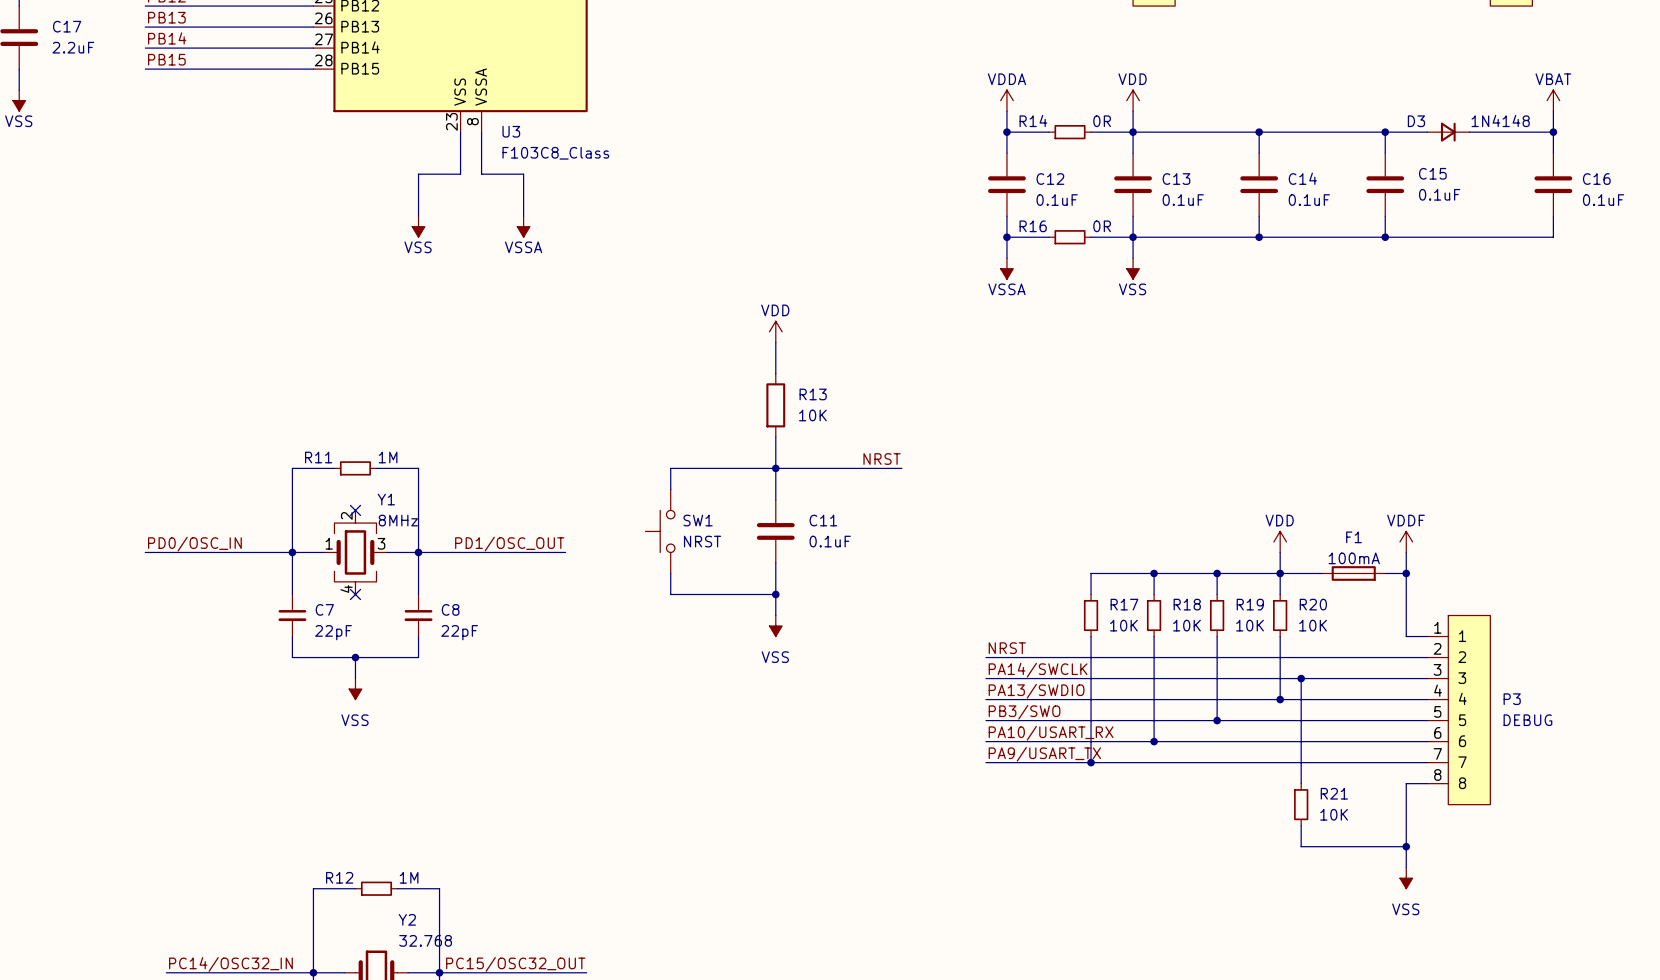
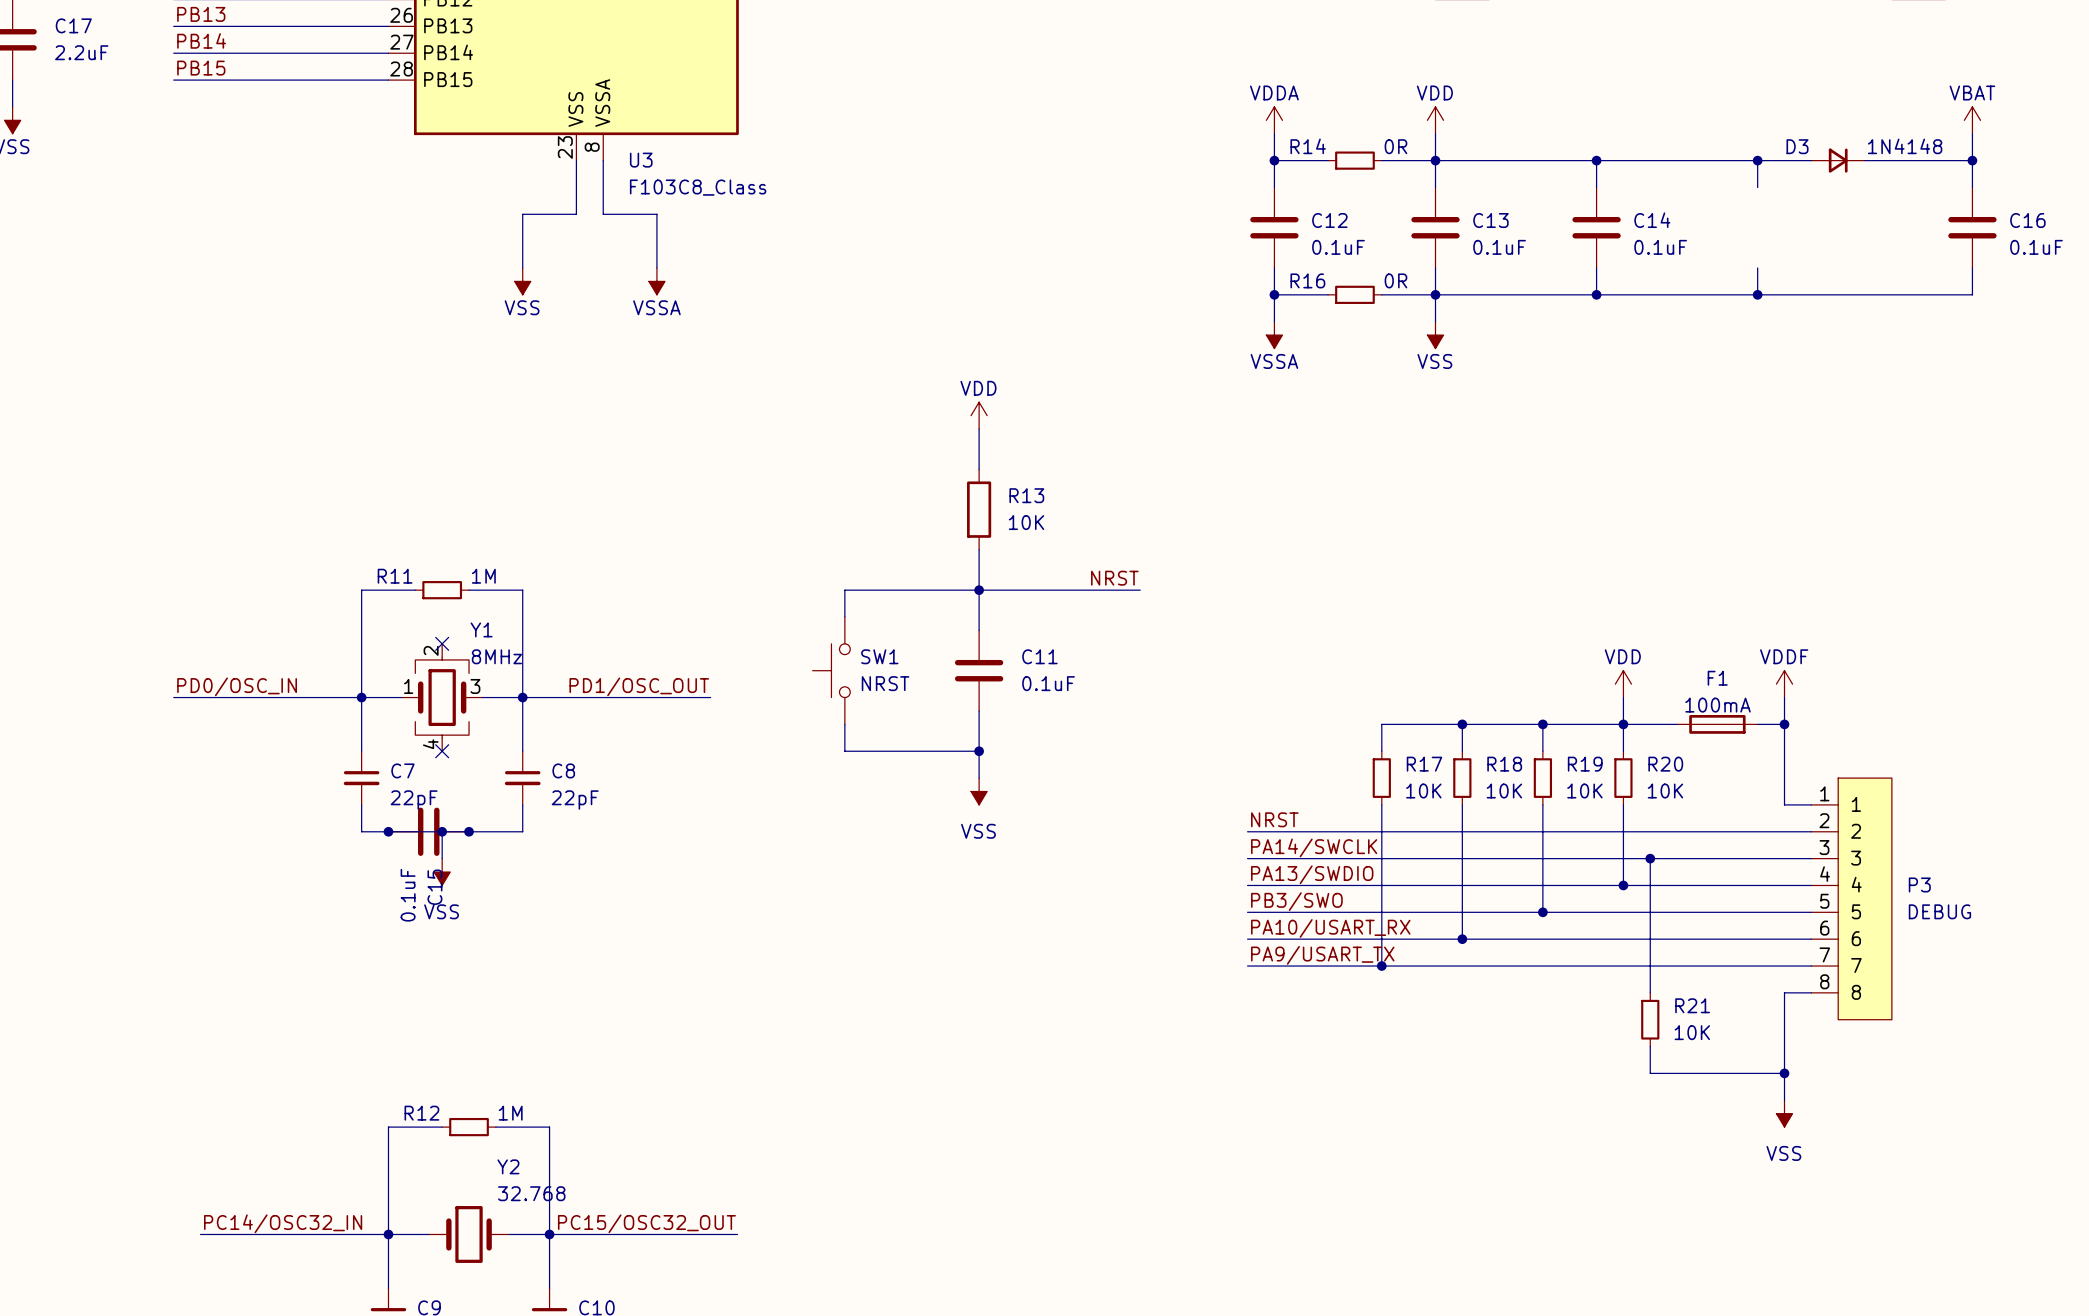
C15 rotation: 0° (1385, 184) -> 90° clockwise (428, 831)
C15 position: (1385, 184) -> (428, 831)
junction: none -> (388, 831)
junction: none -> (469, 831)

